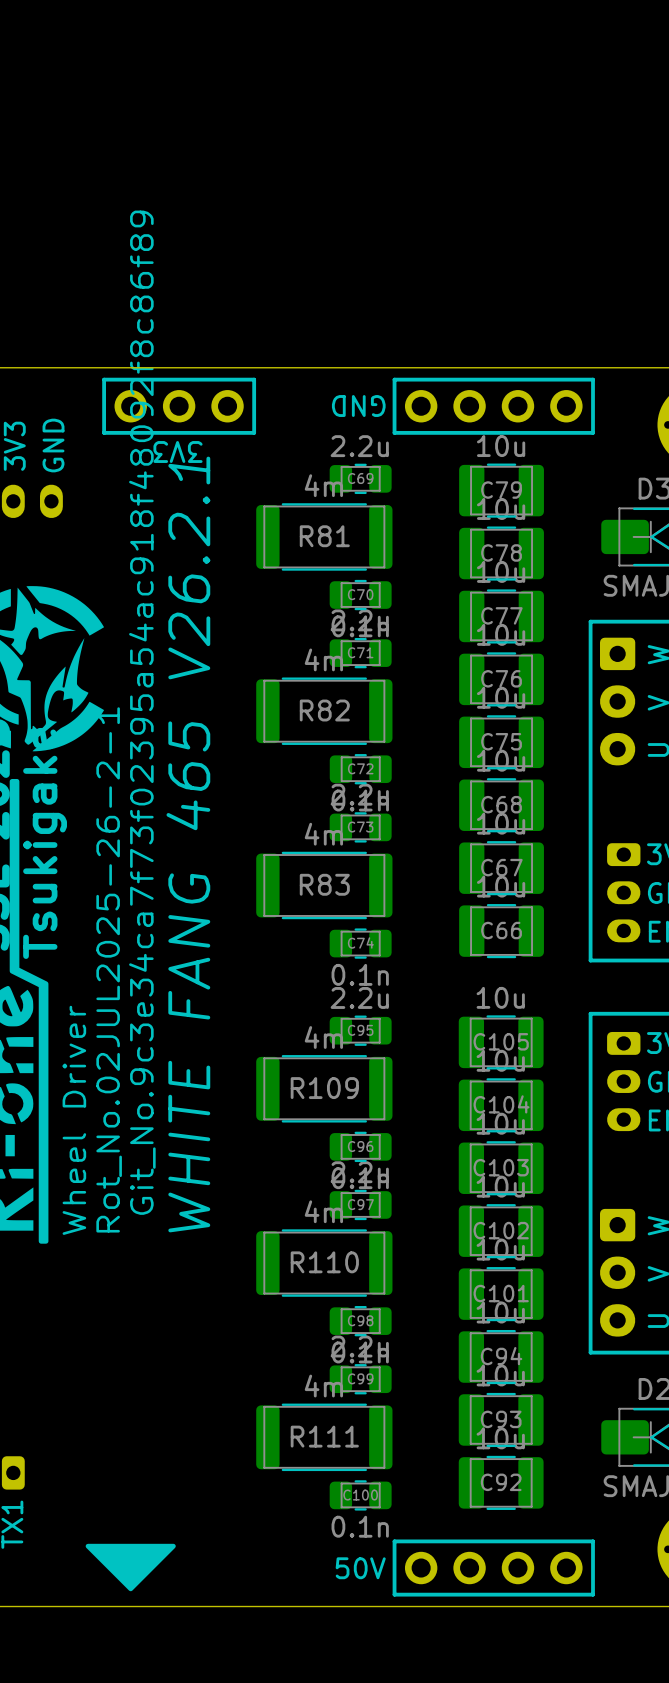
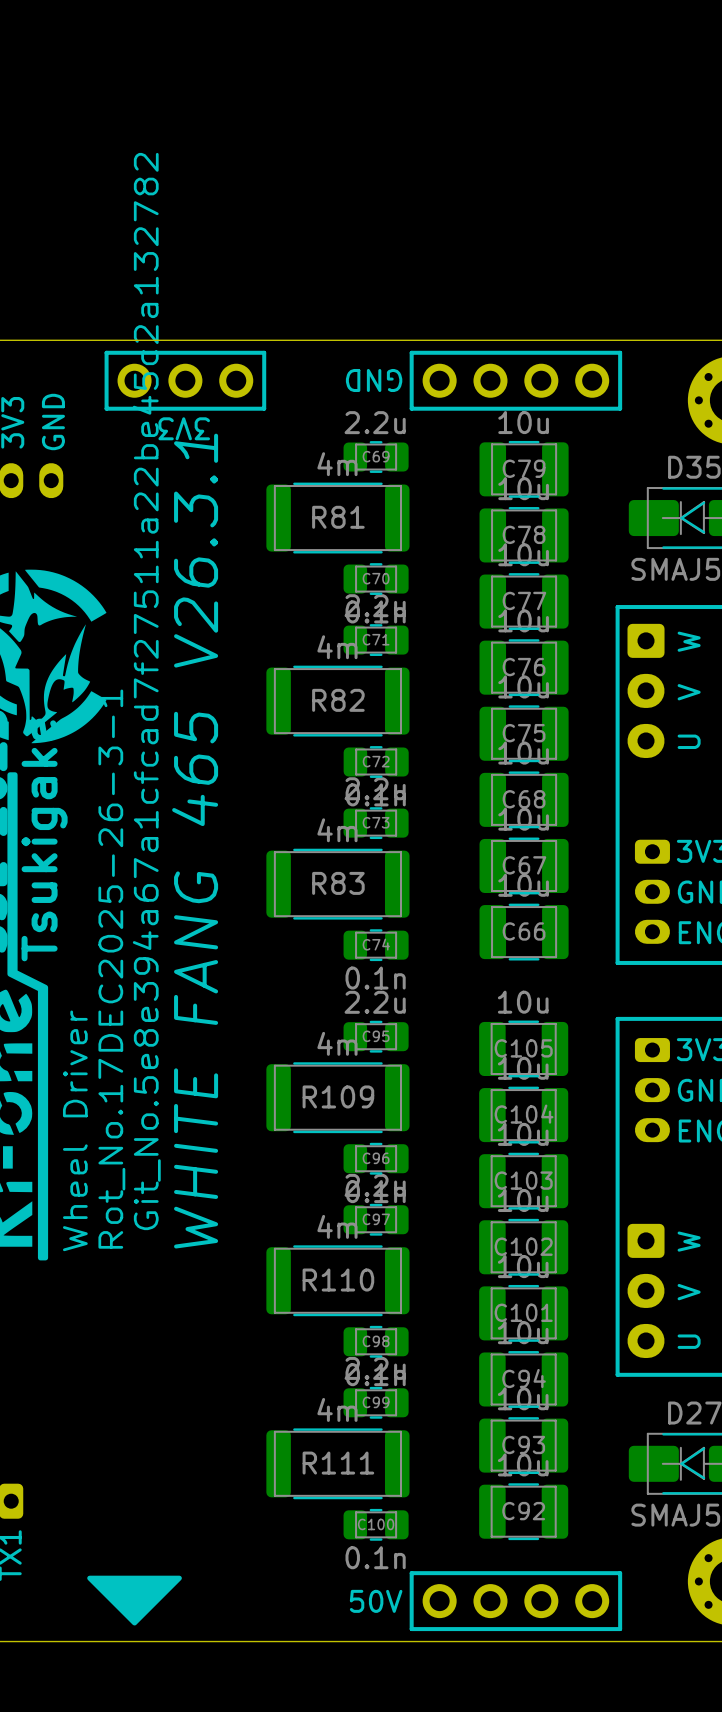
text: Git_No.9c3e34ca7f73f02395a54ac918f48092f8c86f89 (142, 712) -> Git_No.5e8e394a67a1cfcad7f27511a22be45c2a132782 (146, 691)
text: WHITE FANG 465 V26.2.1 (188, 844) -> WHITE FANG 465 V26.3.1 (195, 841)
text: Rot_No.02JUL2025-26-2-1 (109, 969) -> Rot_No.17DEC2025-26-3-1 (111, 969)

